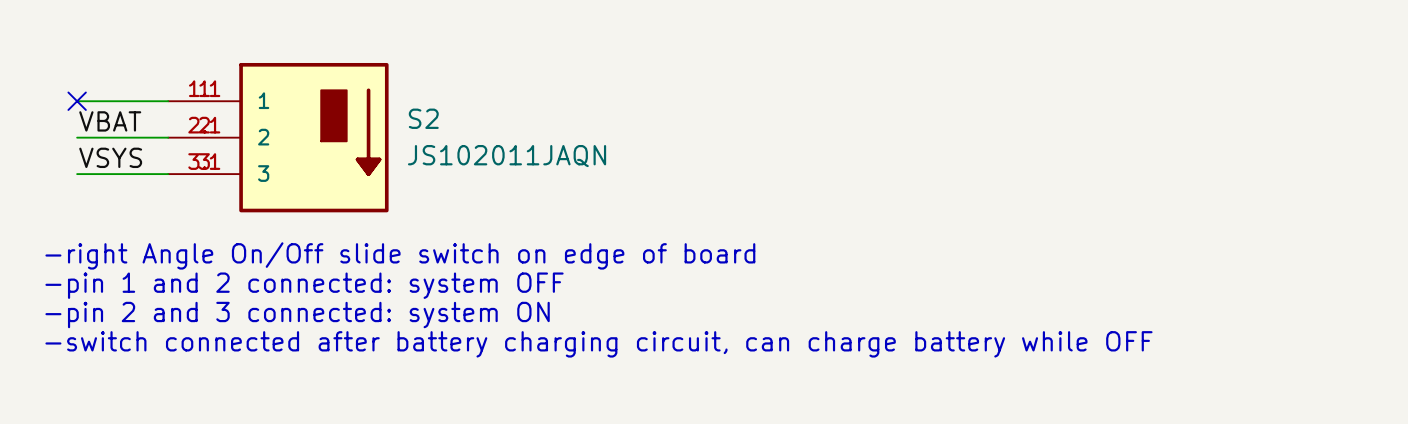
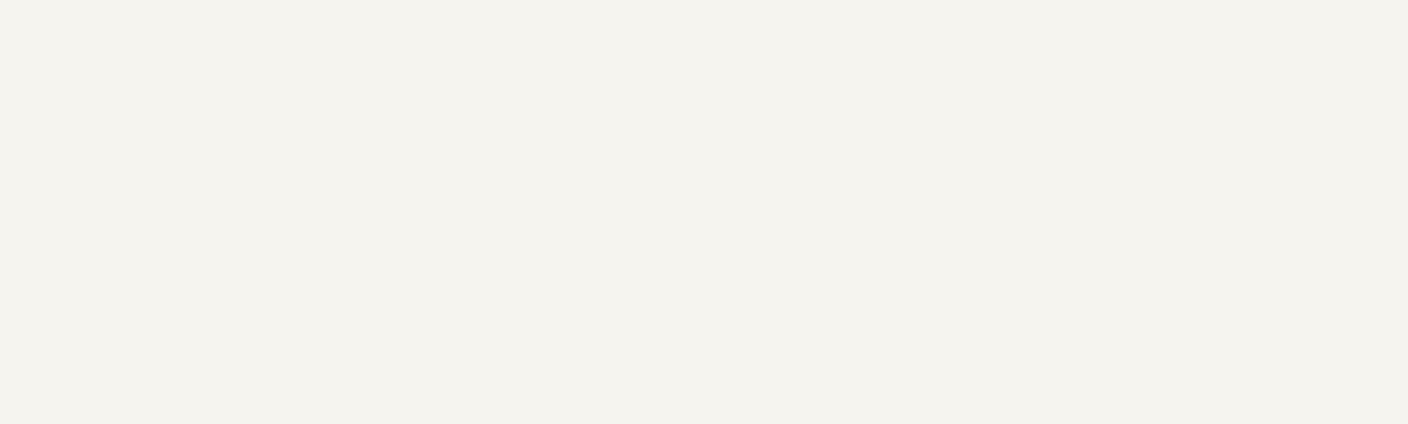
wire: (77, 101) (168, 101) -> none
no-connect mark: (77, 101) -> none
label: VBAT (110, 121) -> none
wire: (77, 137) (168, 137) -> none
S2: JS102011JAQN (278, 137) -> none
label: VSYS (110, 157) -> none
wire: (77, 174) (168, 174) -> none
text: -right Angle On/Off slide switch on edge of board (400, 255) -> none
text: -pin 1 and 2 connected: system OFF (304, 285) -> none
text: -pin 2 and 3 connected: system ON (297, 315) -> none
text: -switch connected after battery charging circuit, can charge battery while OFF (598, 344) -> none

